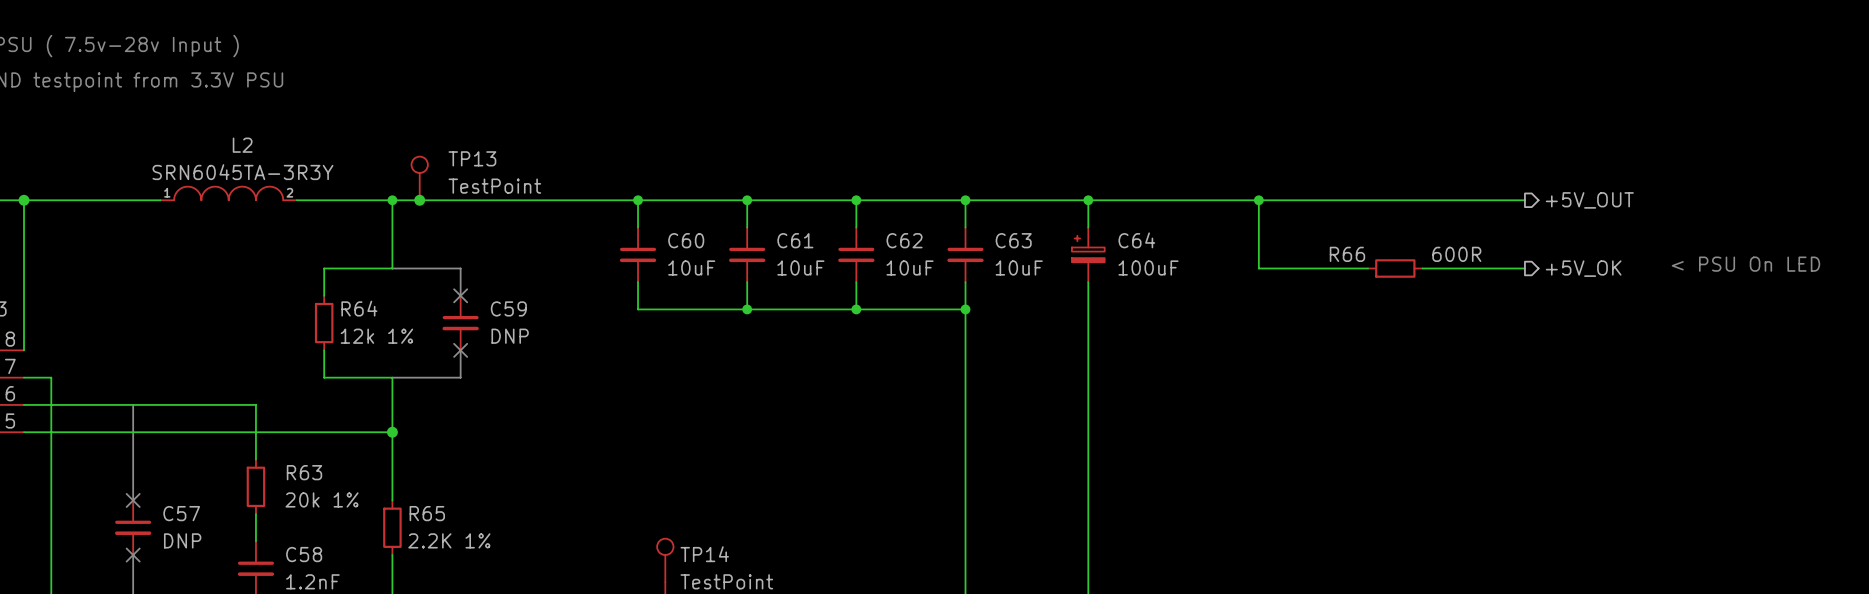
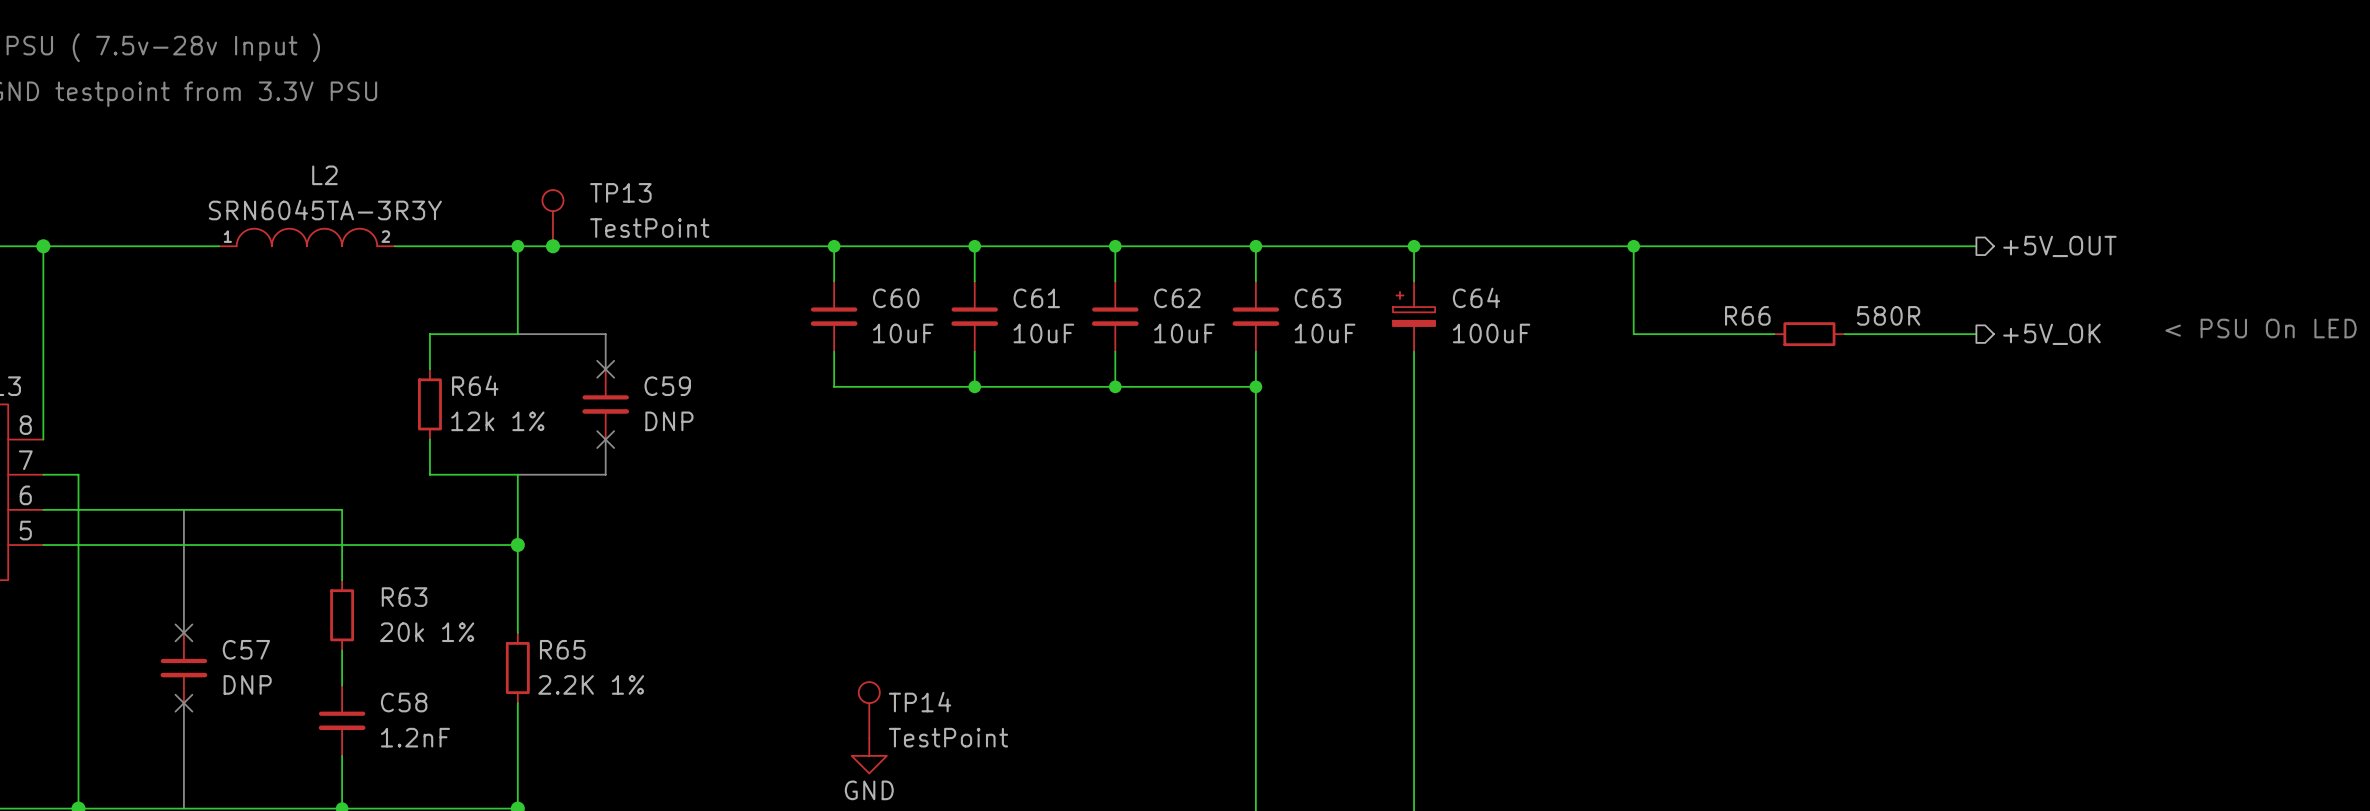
R66 value: 600R (1456, 254) -> 580R (1888, 315)

